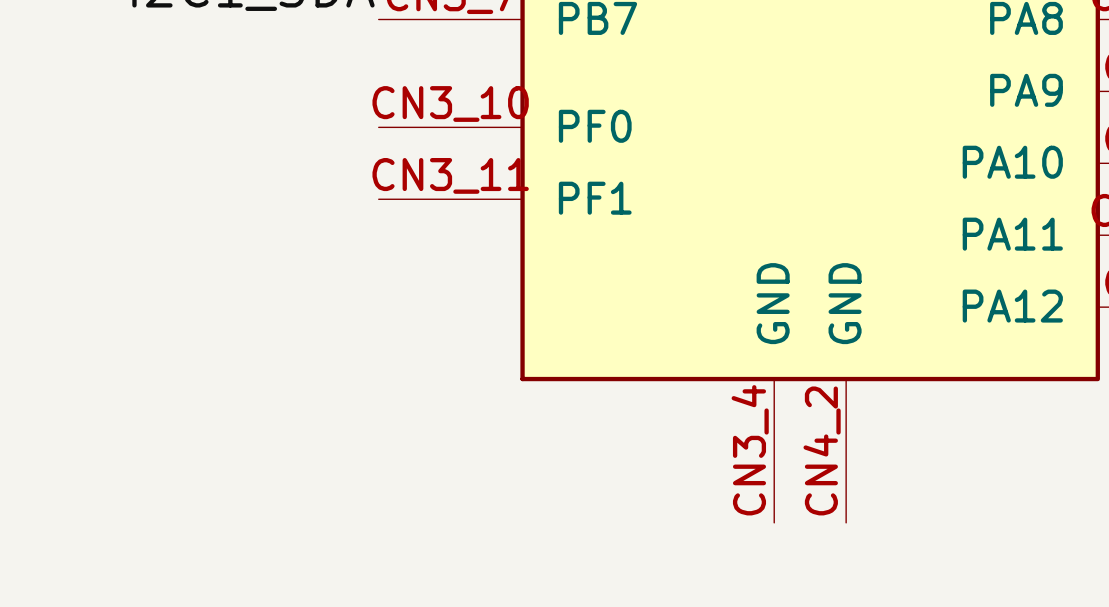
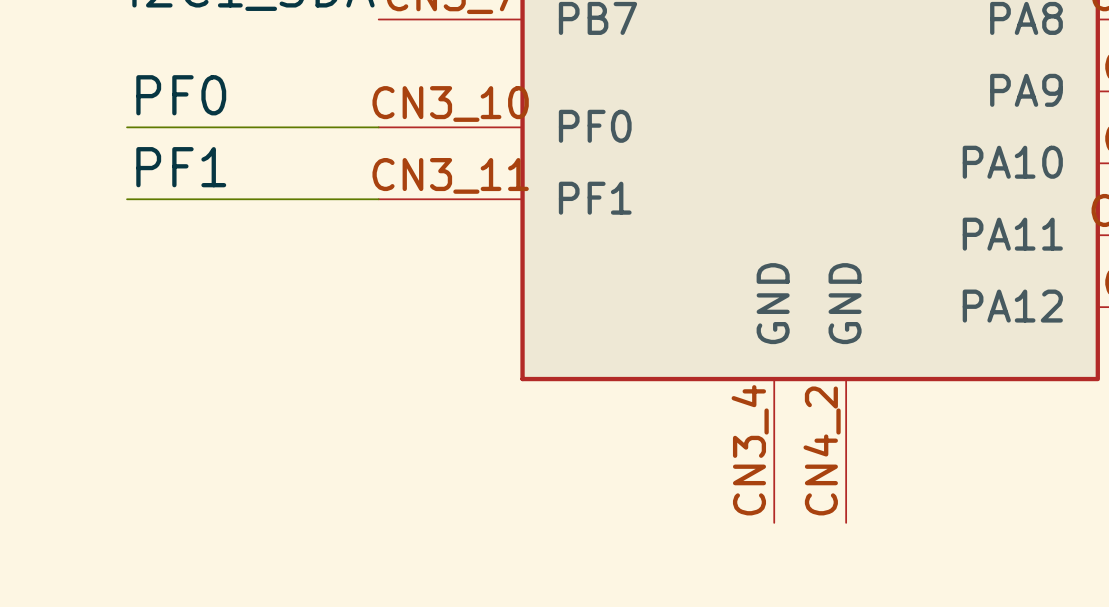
label: none -> PF0 (181, 95)
wire: none -> (127, 127) (378, 127)
label: none -> PF1 (181, 167)
wire: none -> (127, 199) (378, 199)

